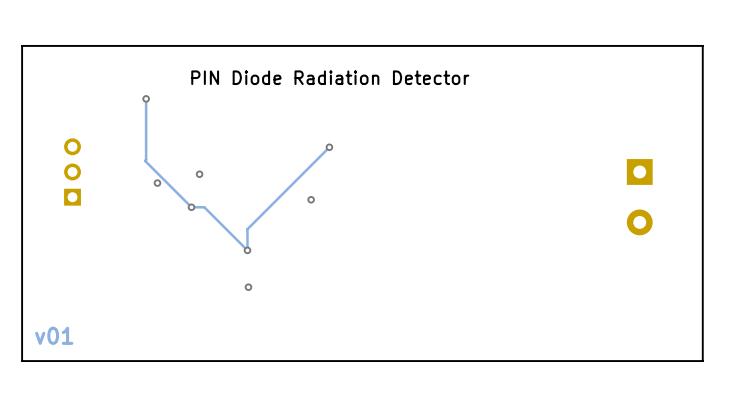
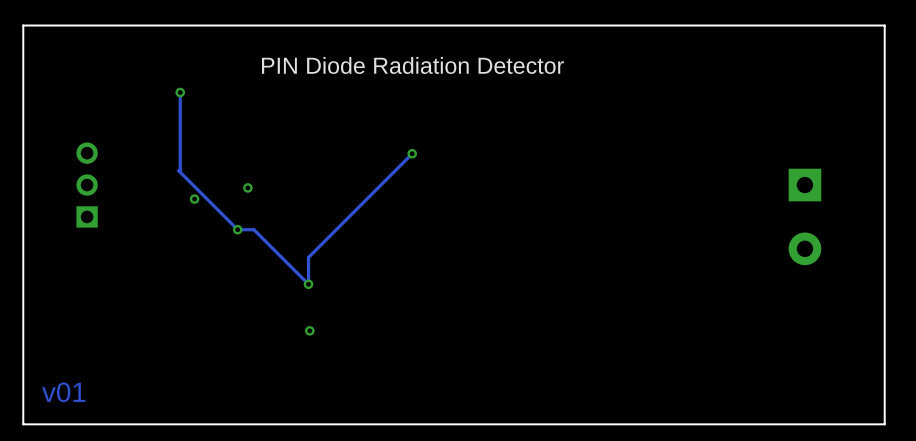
via: (311, 199) -> none

